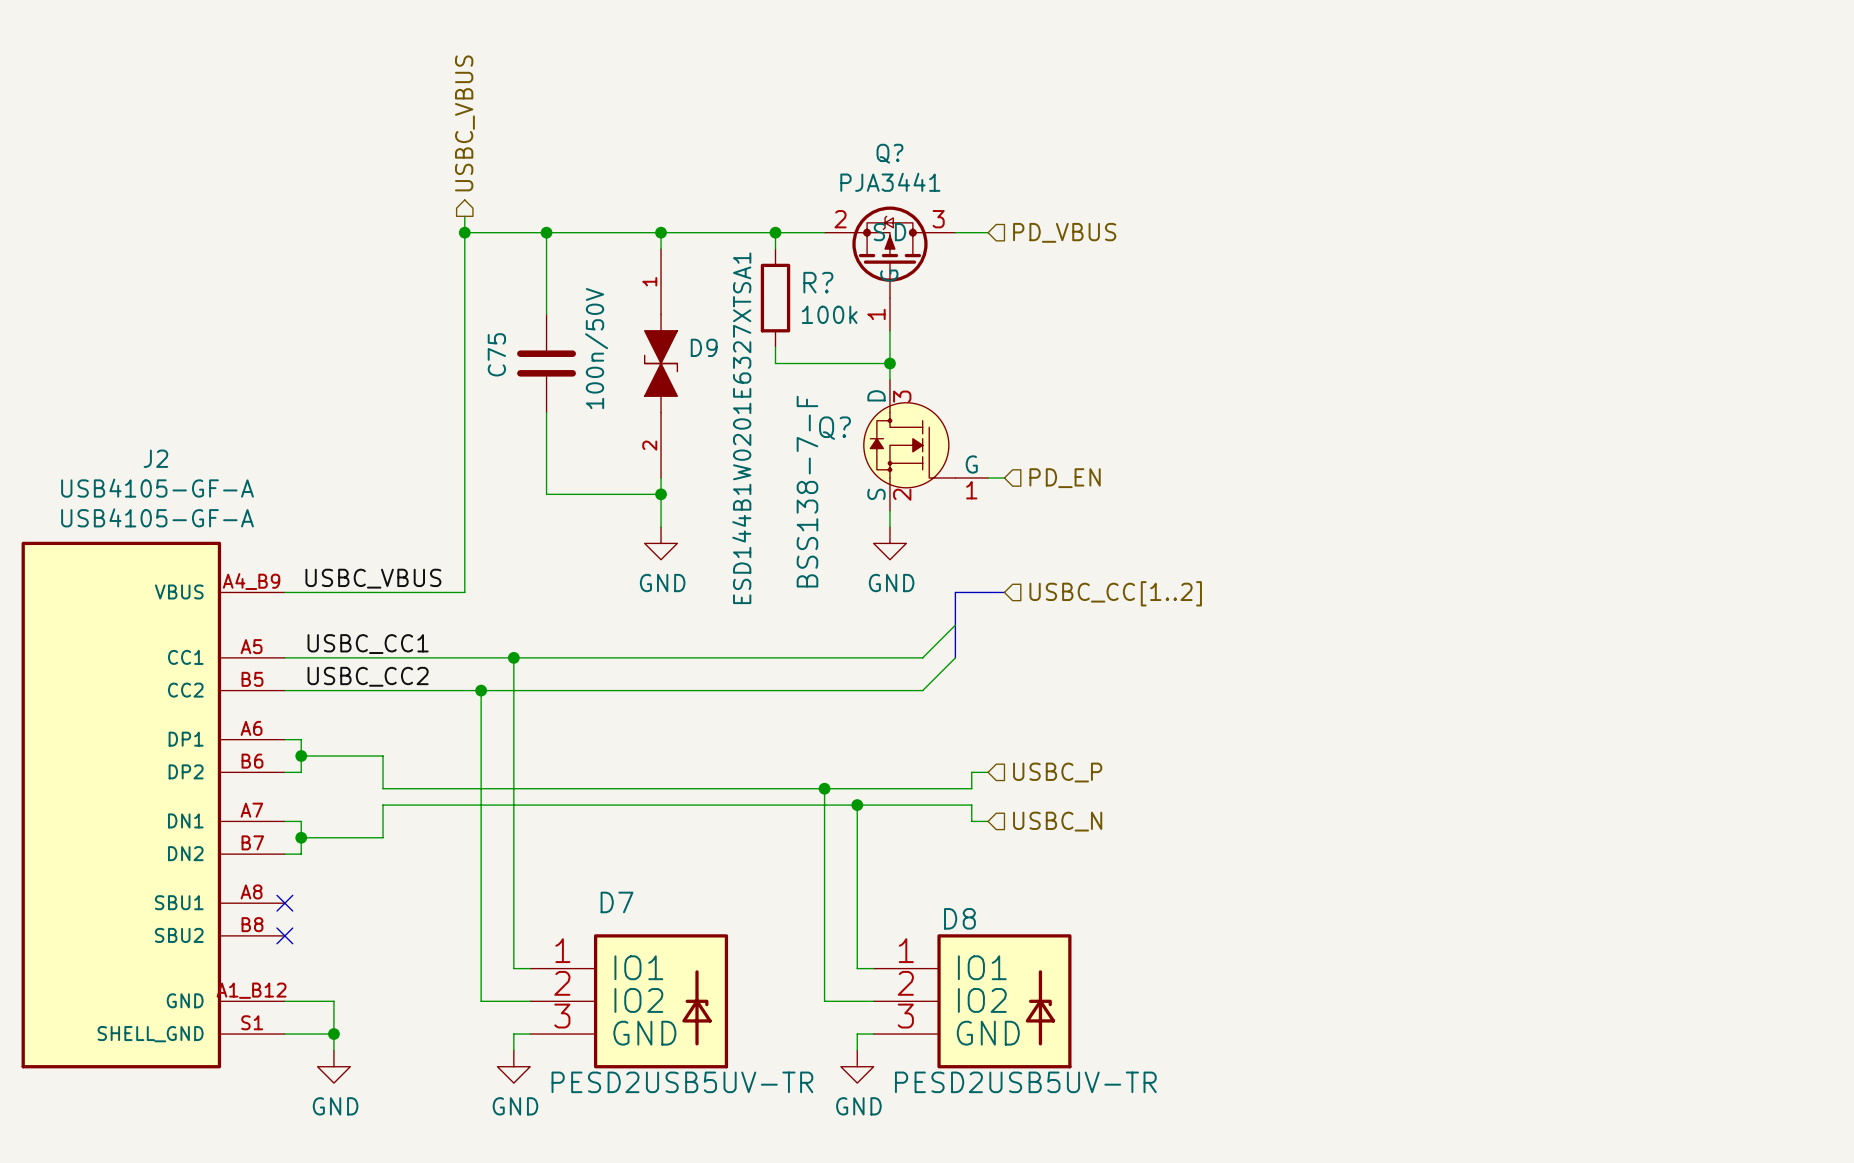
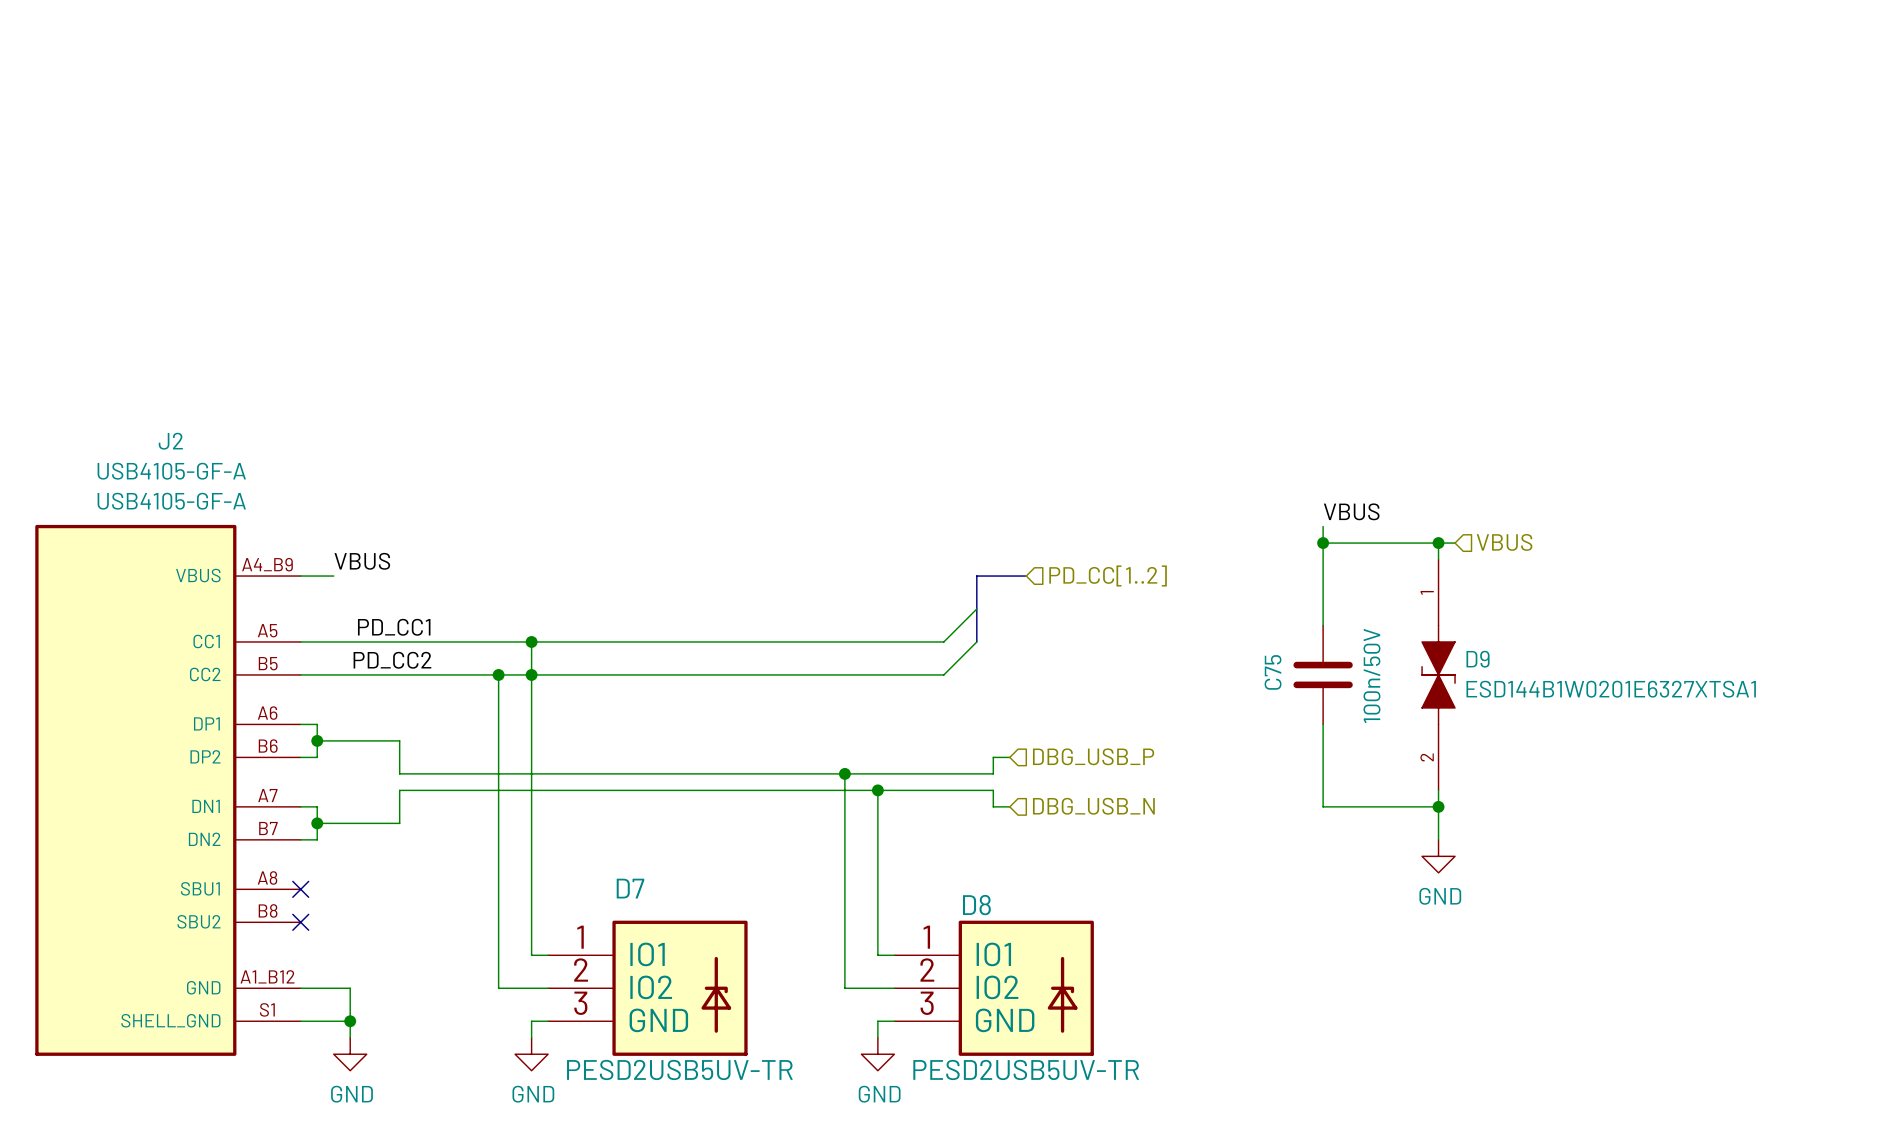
hierarchical label: USBC_VBUS (464, 123) -> none
wire: (464, 216) (464, 592) (317, 592) -> none
wire: (464, 232) (824, 232) -> none
junction: (464, 232) -> none
wire: (546, 232) (546, 314) -> none
junction: (546, 232) -> none
wire: (661, 232) (661, 249) -> none
junction: (661, 232) -> none
wire: (775, 232) (775, 249) -> none
junction: (775, 232) -> none
wire: (955, 232) (988, 232) -> none
hierarchical label: PD_VBUS (1064, 232) -> none
Q?: PJA3441 (889, 268) -> none
R?: (775, 298) -> none
wire: (889, 330) (889, 379) -> none
wire: (775, 347) (775, 363) (889, 363) -> none
C75 position: (546, 363) -> (1323, 674)
D9 position: (661, 363) -> (1438, 674)
junction: (889, 363) -> none
wire: (546, 412) (546, 494) (661, 494) -> none
D9 value rotation: 0° (741, 428) -> 90° clockwise (1611, 689)
Q?: BSS138-7-F (925, 445) -> none
wire: (661, 477) (661, 527) -> none
wire: (988, 477) (1004, 477) -> none
hierarchical label: PD_EN (1065, 478) -> none
junction: (661, 494) -> none
wire: (889, 510) (889, 527) -> none
label: none -> VBUS (1351, 511)
power symbol: GND (661, 543) -> none
power symbol: GND (889, 543) -> none
wire: none -> (1323, 526) (1323, 625)
wire: none -> (1323, 543) (1455, 543)
junction: none -> (1323, 543)
wire: none -> (1438, 543) (1438, 559)
junction: none -> (1438, 543)
hierarchical label: none -> VBUS (1504, 542)
label: USBC_VBUS (373, 578) -> VBUS (362, 561)
hierarchical label: USBC_CC[1..2] (1115, 593) -> PD_CC[1..2] (1108, 575)
label: USBC_CC1 (368, 644) -> none
label: none -> PD_CC1 (394, 627)
label: USBC_CC2 (368, 676) -> none
label: none -> PD_CC2 (392, 660)
junction: none -> (531, 674)
wire: none -> (1323, 724) (1323, 806) (1438, 806)
hierarchical label: USBC_P (1057, 772) -> DBG_USB_P (1093, 756)
wire: none -> (1438, 790) (1438, 839)
hierarchical label: USBC_N (1057, 821) -> DBG_USB_N (1093, 806)
junction: none -> (1438, 806)
power symbol: none -> GND (1438, 856)

